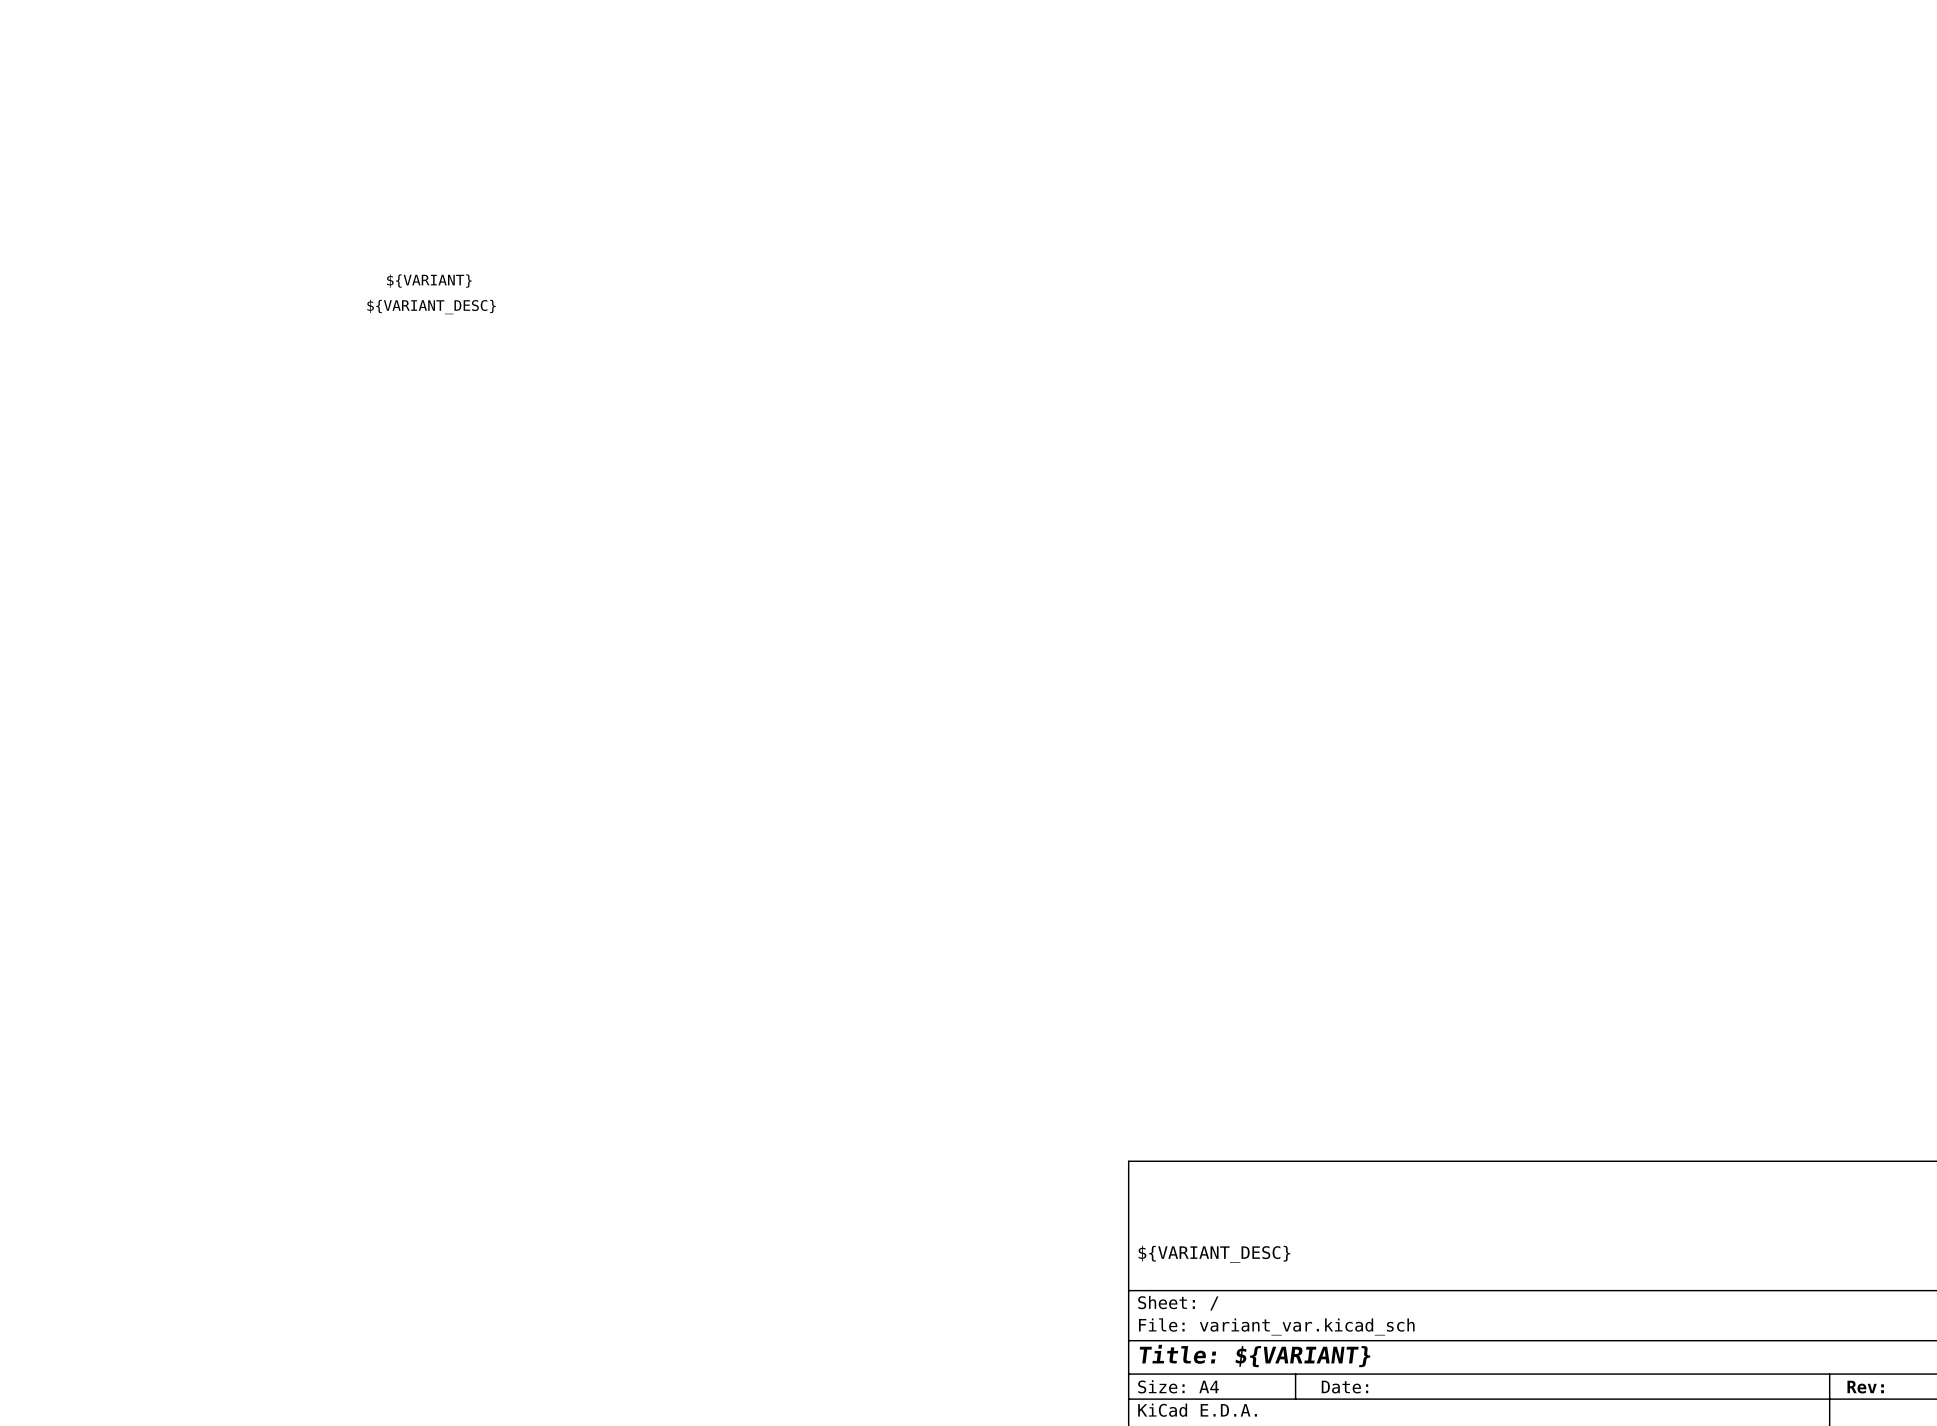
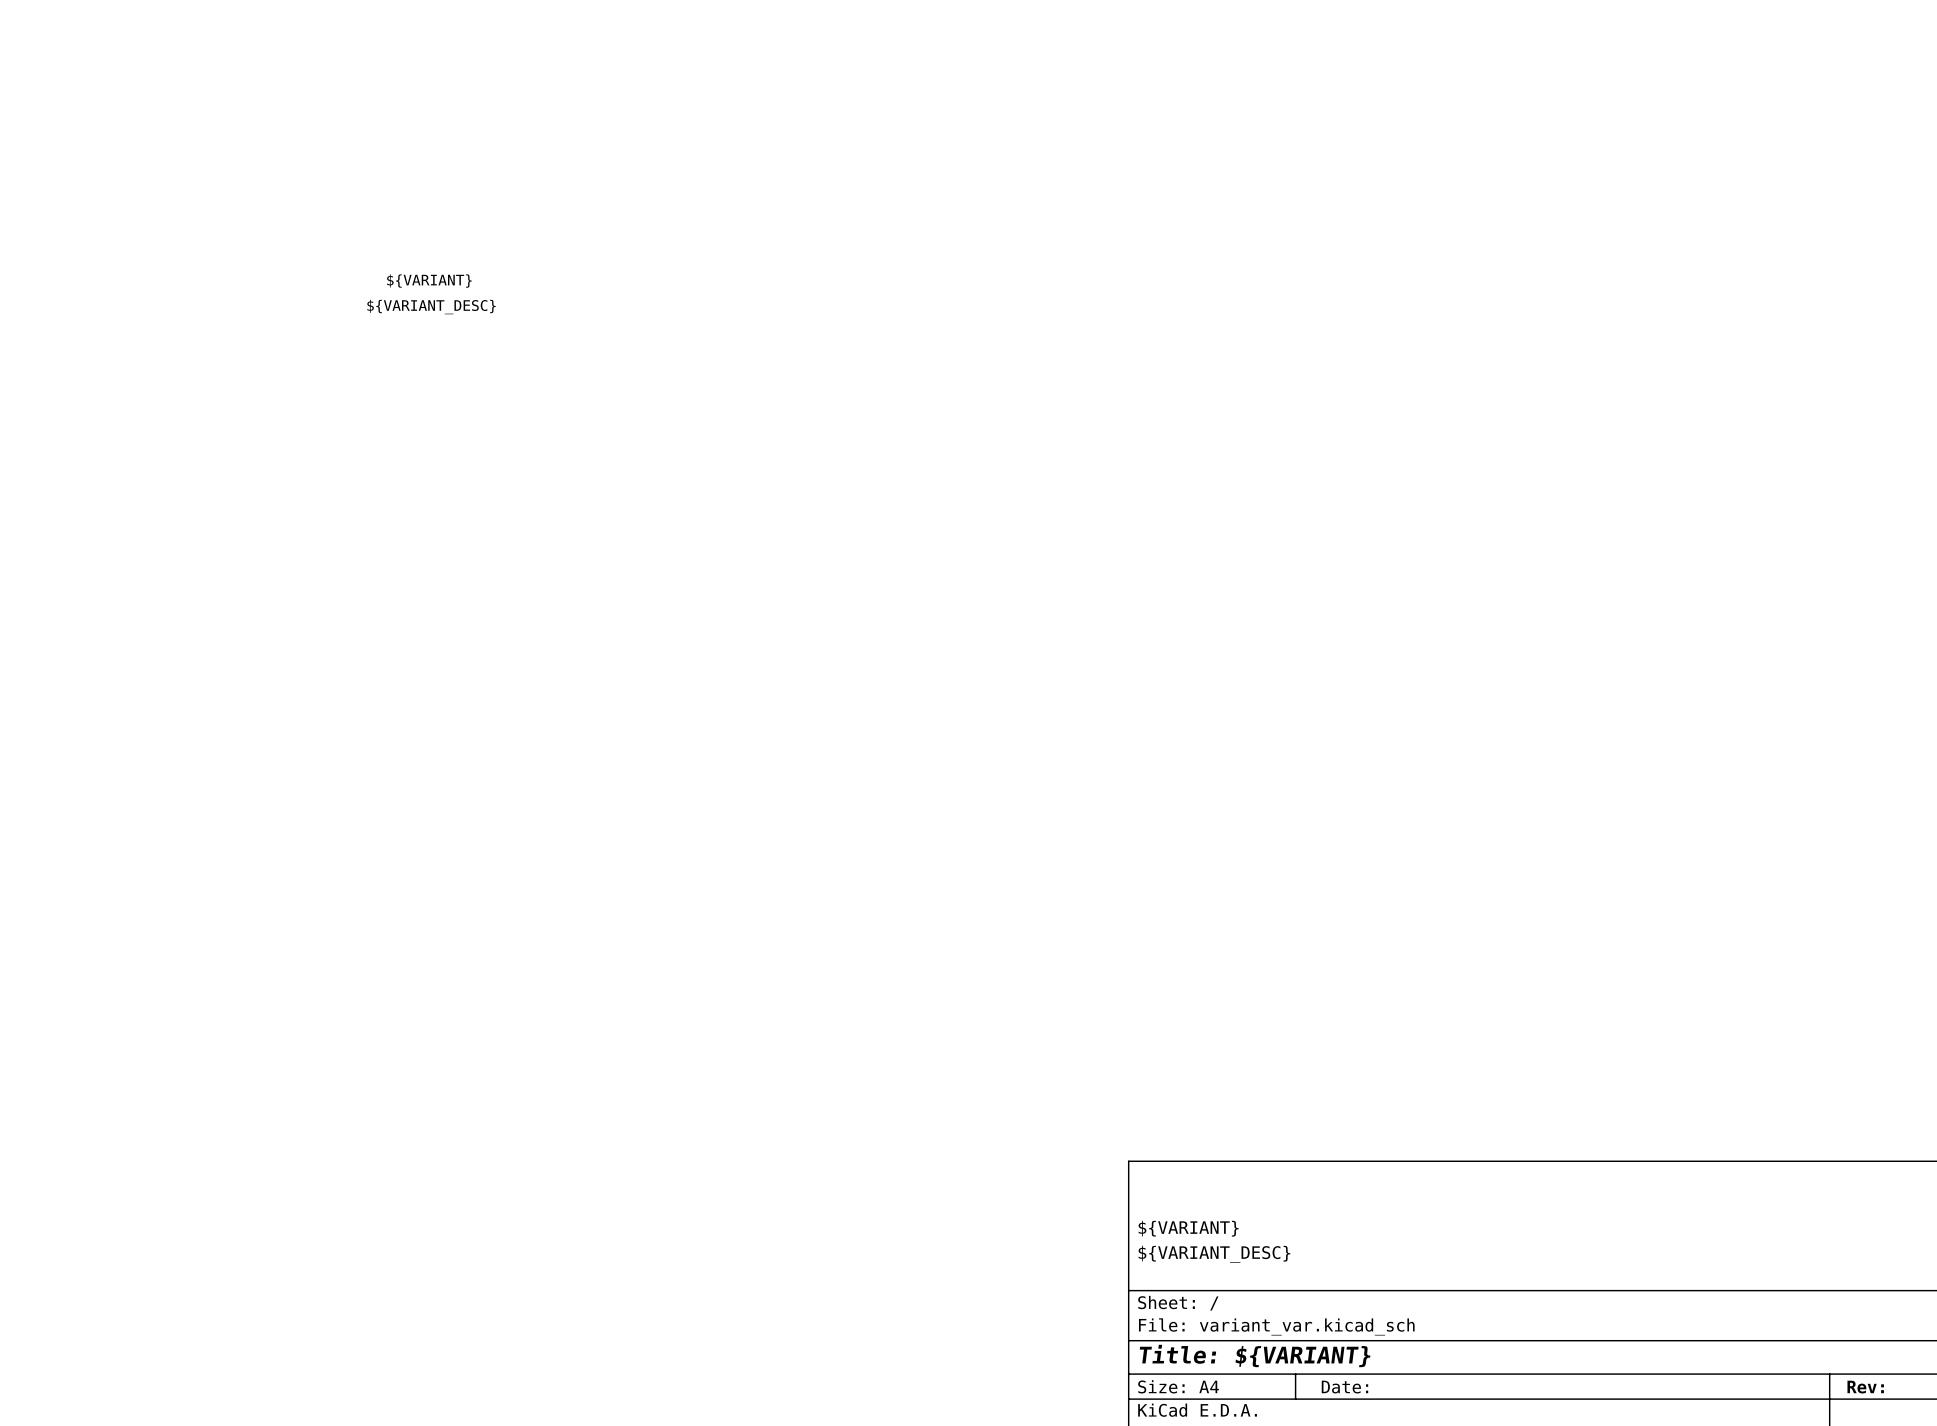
title block: none -> ${VARIANT} (1188, 1228)

